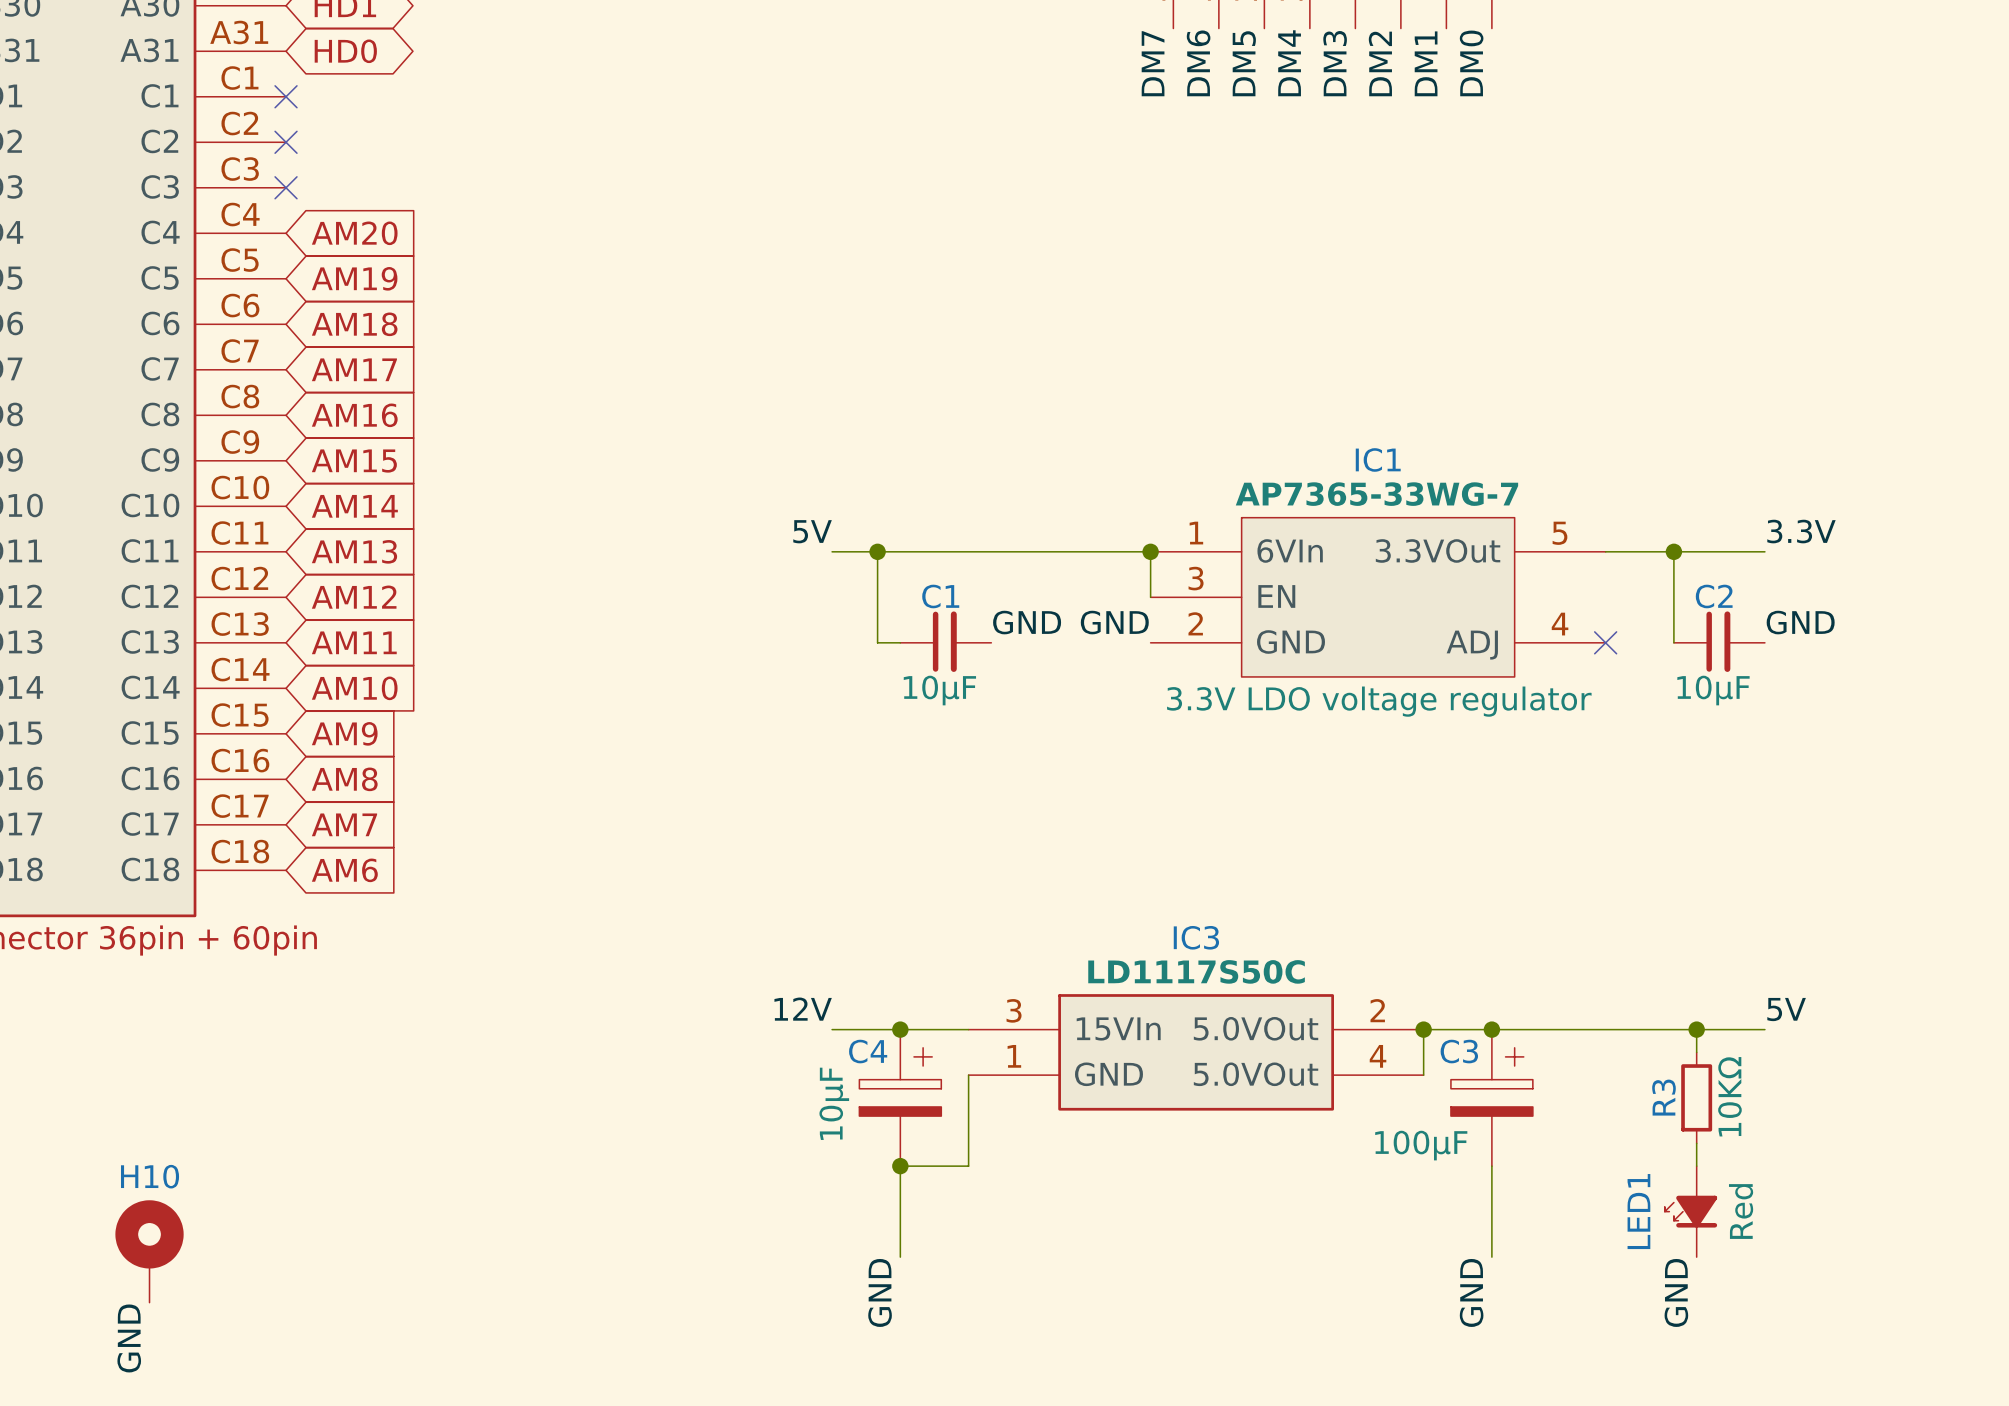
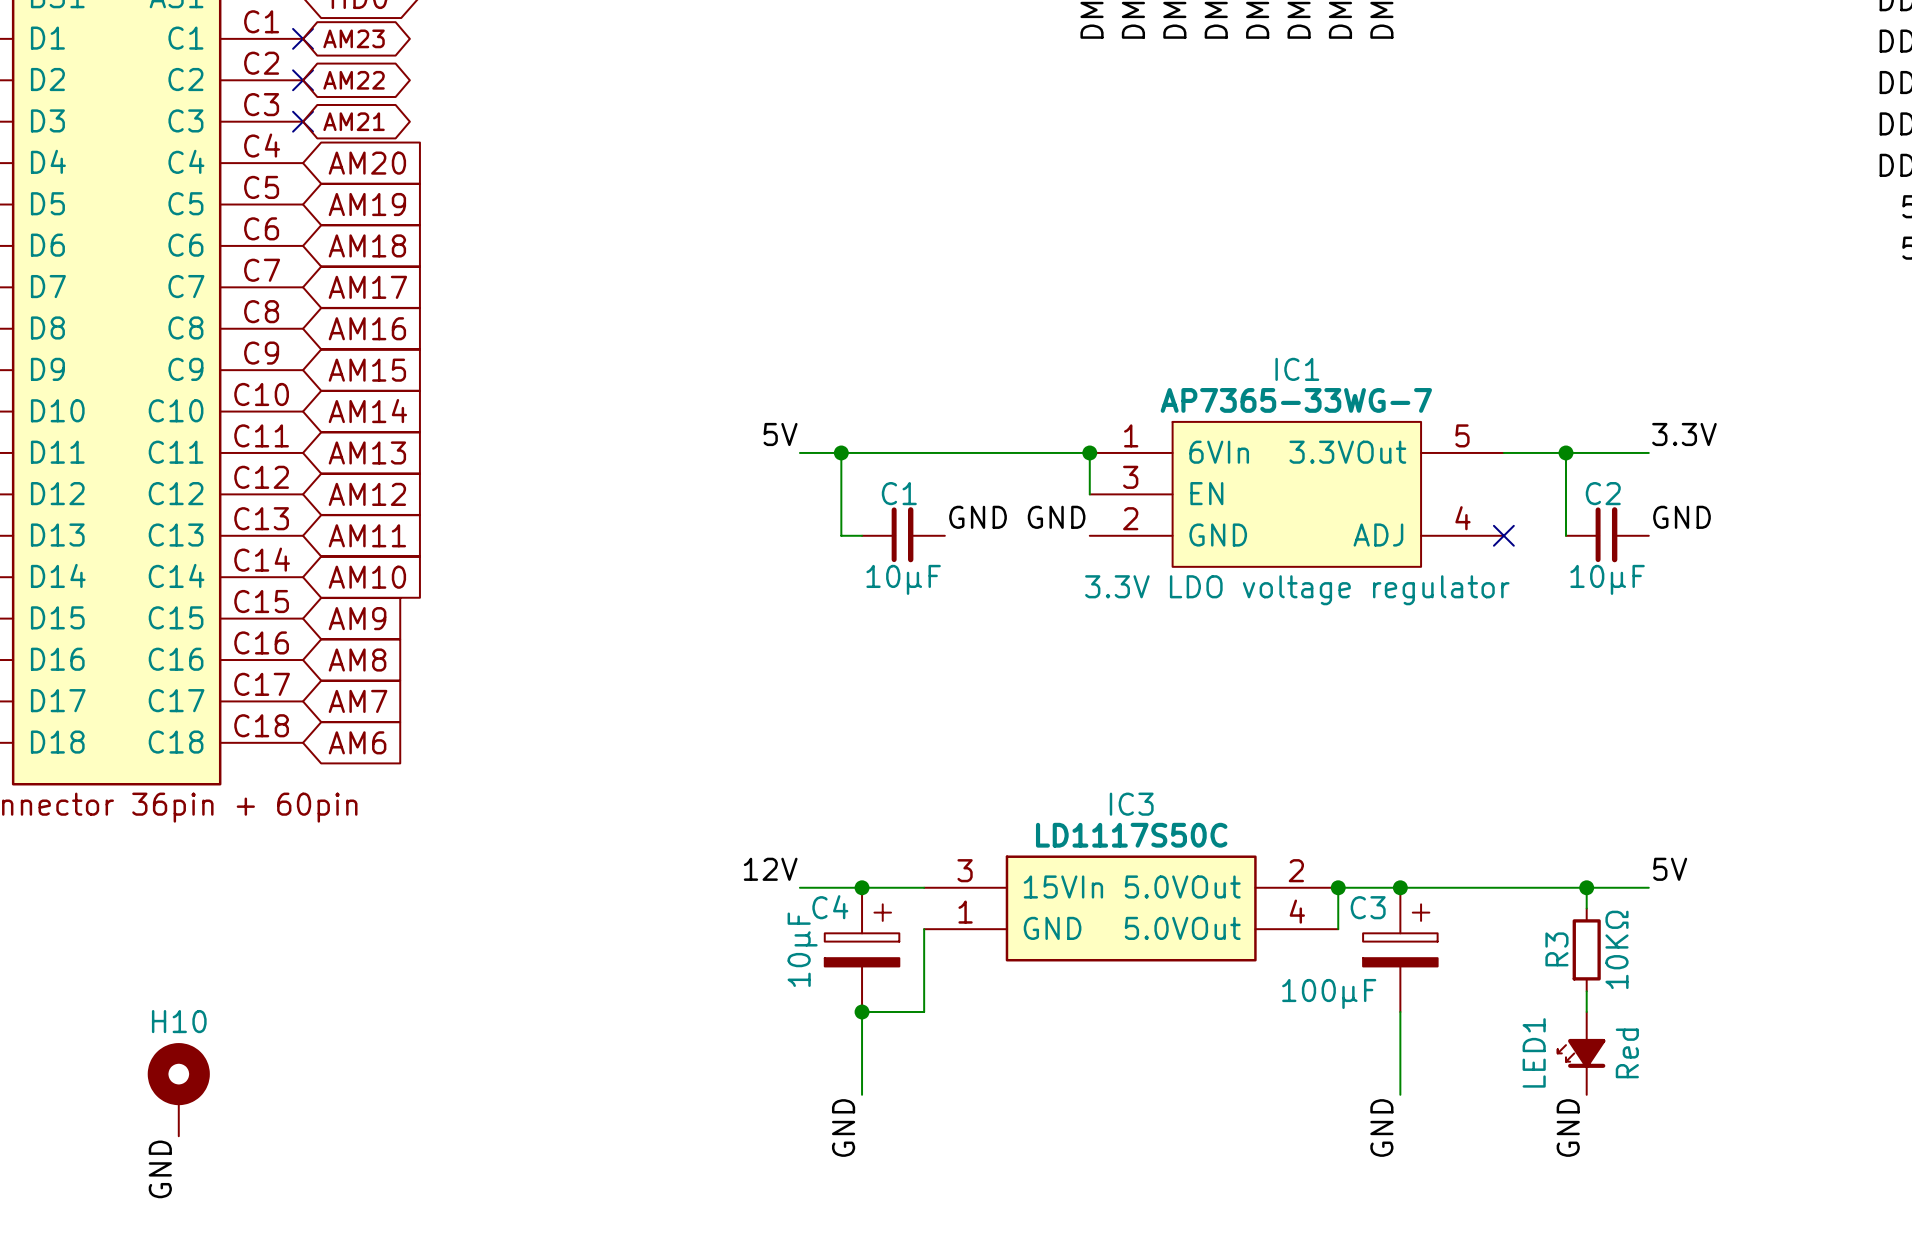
global label: none -> AM23 (354, 38)
global label: none -> AM22 (354, 80)
global label: none -> AM21 (354, 121)

